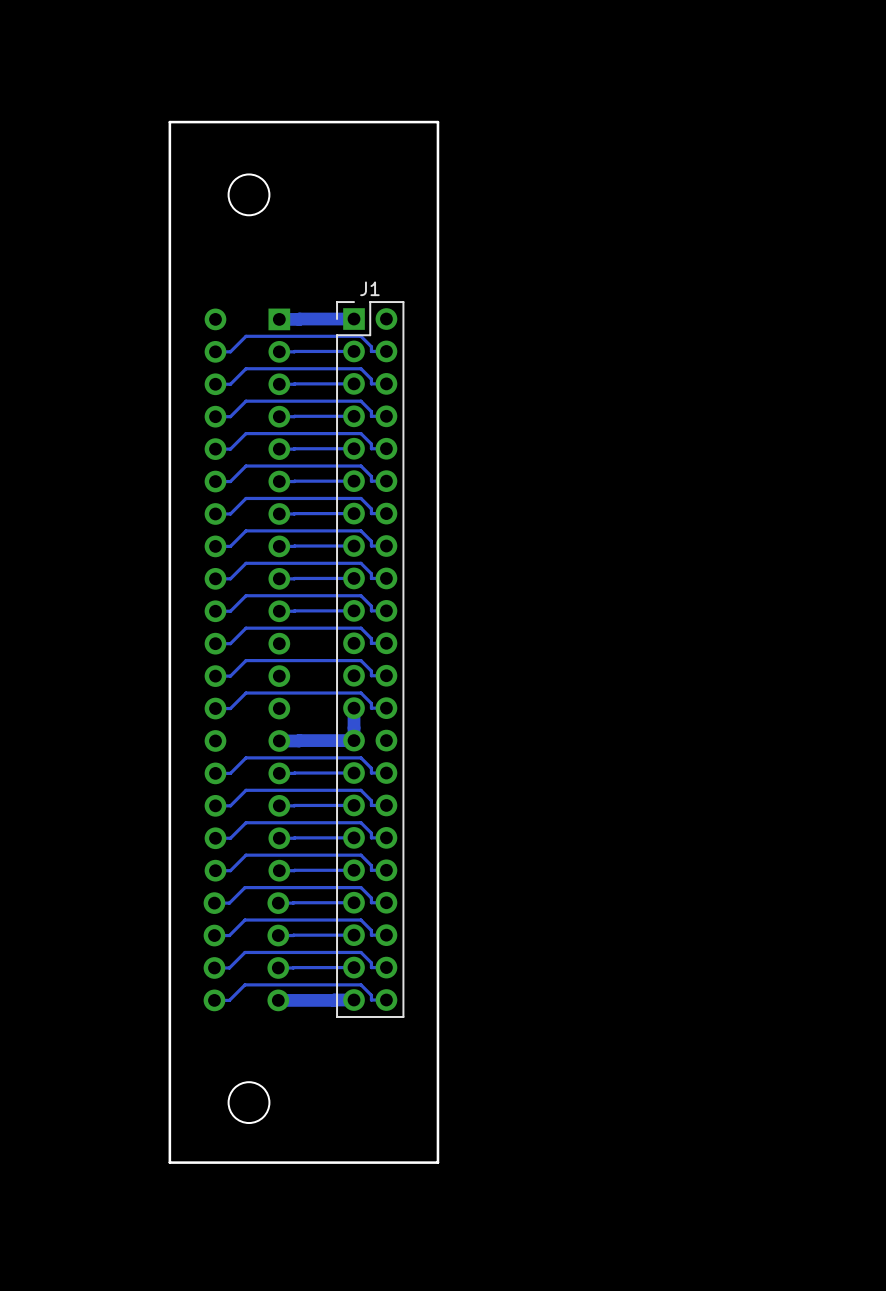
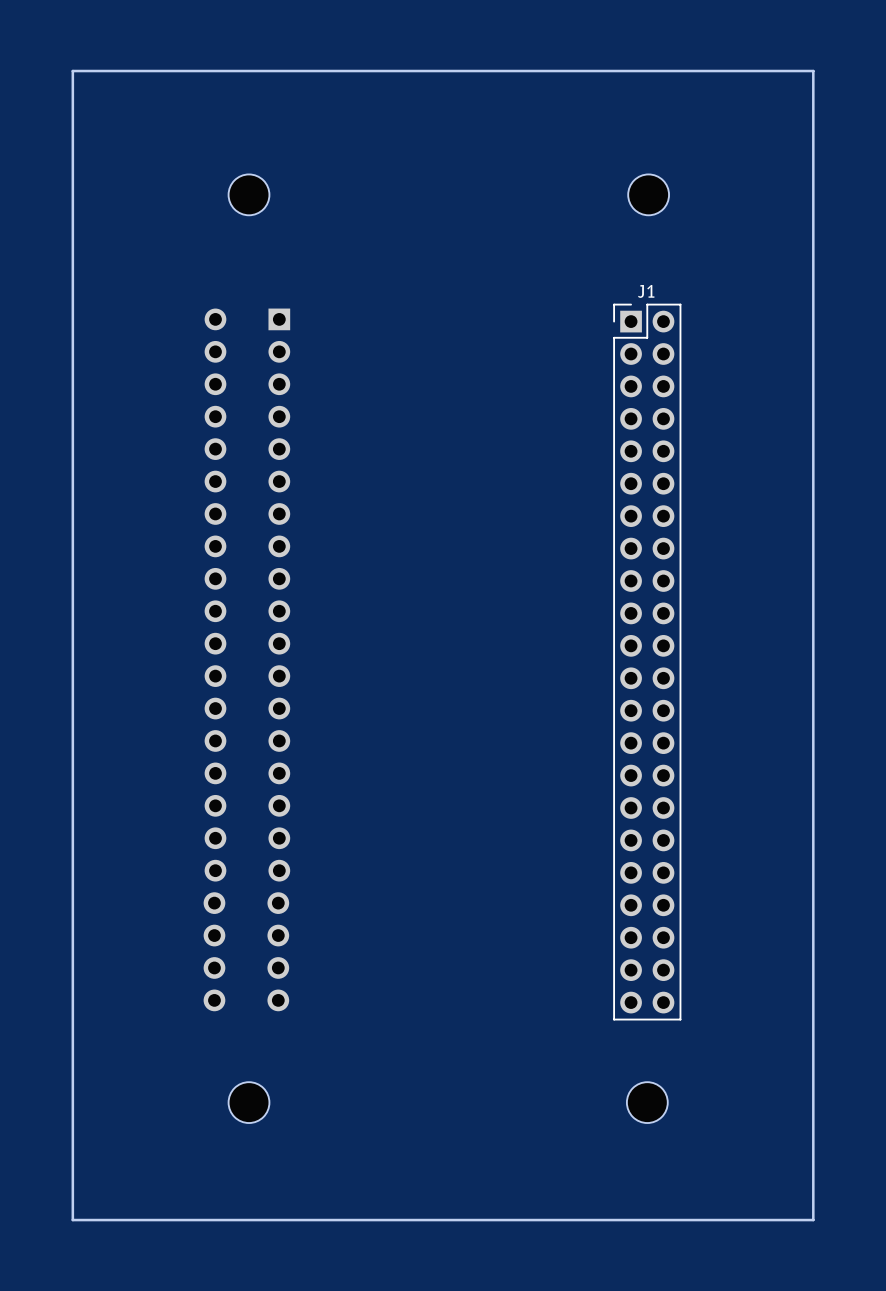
board edge: none -> (813, 71) (72, 71) (72, 1220) (813, 1220) (813, 71)
board edge: (437, 122) (169, 122) (169, 1162) (437, 1162) (437, 122) -> none
part: none -> (648, 194)
track: (354, 319) (279, 319) -> none
track: (354, 351) (279, 351) -> none
track: (386, 351) (371, 351) (371, 346) (360, 336) (246, 336) (230, 351) (215, 351) -> none
track: (354, 383) (279, 384) -> none
track: (386, 383) (371, 383) (371, 379) (360, 368) (246, 368) (230, 384) (215, 384) -> none
track: (354, 416) (279, 416) -> none
track: (386, 416) (371, 416) (371, 411) (360, 401) (246, 401) (230, 416) (215, 416) -> none
track: (354, 448) (279, 449) -> none
track: (386, 448) (371, 448) (371, 444) (360, 433) (246, 433) (230, 449) (215, 449) -> none
track: (354, 481) (279, 481) -> none
track: (386, 481) (371, 481) (371, 476) (360, 466) (246, 466) (230, 481) (215, 481) -> none
track: (354, 513) (279, 513) -> none
track: (386, 513) (371, 513) (371, 508) (360, 498) (246, 498) (230, 513) (215, 513) -> none
track: (354, 546) (279, 546) -> none
track: (386, 546) (371, 546) (371, 541) (360, 530) (246, 530) (230, 546) (215, 546) -> none
track: (354, 578) (279, 578) -> none
track: (386, 578) (371, 578) (371, 573) (360, 563) (246, 563) (230, 578) (215, 578) -> none
track: (354, 610) (279, 611) -> none
track: (386, 610) (371, 610) (371, 606) (360, 595) (246, 595) (230, 611) (215, 611) -> none
track: (386, 643) (371, 643) (371, 638) (360, 628) (246, 628) (230, 643) (215, 643) -> none
J1 position: (370, 659) -> (647, 662)
track: (386, 675) (371, 675) (371, 671) (360, 660) (246, 660) (230, 676) (215, 676) -> none
track: (354, 708) (354, 740) (279, 740) -> none
track: (386, 708) (371, 708) (371, 703) (360, 693) (246, 693) (230, 708) (215, 708) -> none
track: (354, 773) (279, 773) -> none
track: (386, 773) (371, 773) (371, 768) (360, 757) (246, 757) (230, 773) (215, 773) -> none
track: (354, 805) (279, 805) -> none
track: (386, 805) (371, 805) (371, 800) (360, 790) (246, 790) (230, 805) (215, 805) -> none
track: (354, 837) (279, 838) -> none
track: (386, 837) (371, 837) (371, 833) (360, 822) (246, 822) (230, 838) (215, 838) -> none
track: (354, 870) (279, 870) -> none
track: (386, 870) (371, 870) (371, 865) (360, 855) (246, 855) (230, 870) (215, 870) -> none
track: (354, 902) (278, 903) -> none
track: (386, 902) (371, 902) (371, 898) (360, 887) (244, 887) (229, 903) (214, 903) -> none
track: (354, 935) (278, 935) -> none
track: (386, 935) (371, 935) (371, 930) (360, 920) (244, 920) (229, 935) (214, 935) -> none
track: (354, 967) (278, 967) -> none
track: (386, 967) (371, 967) (371, 962) (360, 952) (244, 952) (229, 967) (214, 967) -> none
track: (354, 1000) (278, 1000) -> none
track: (386, 1000) (371, 1000) (371, 995) (360, 984) (244, 984) (229, 1000) (214, 1000) -> none
part: none -> (647, 1102)

